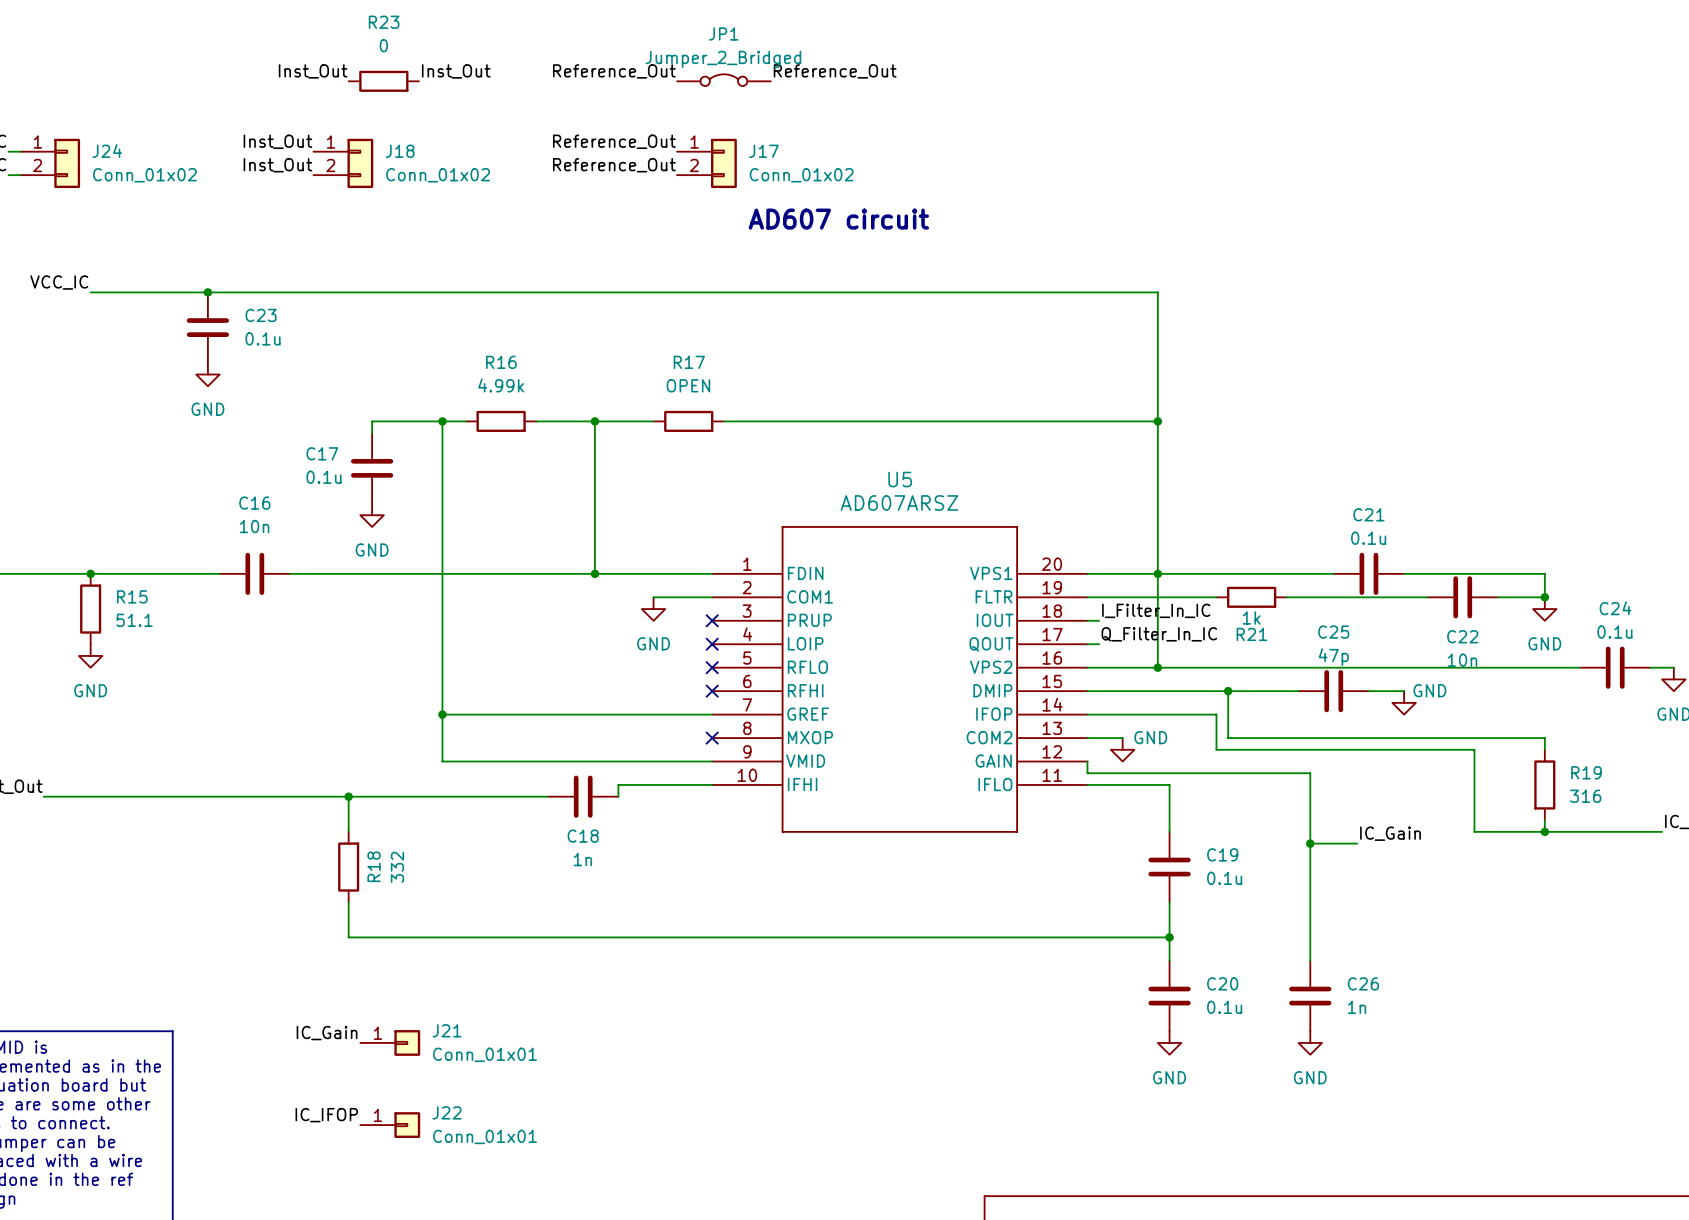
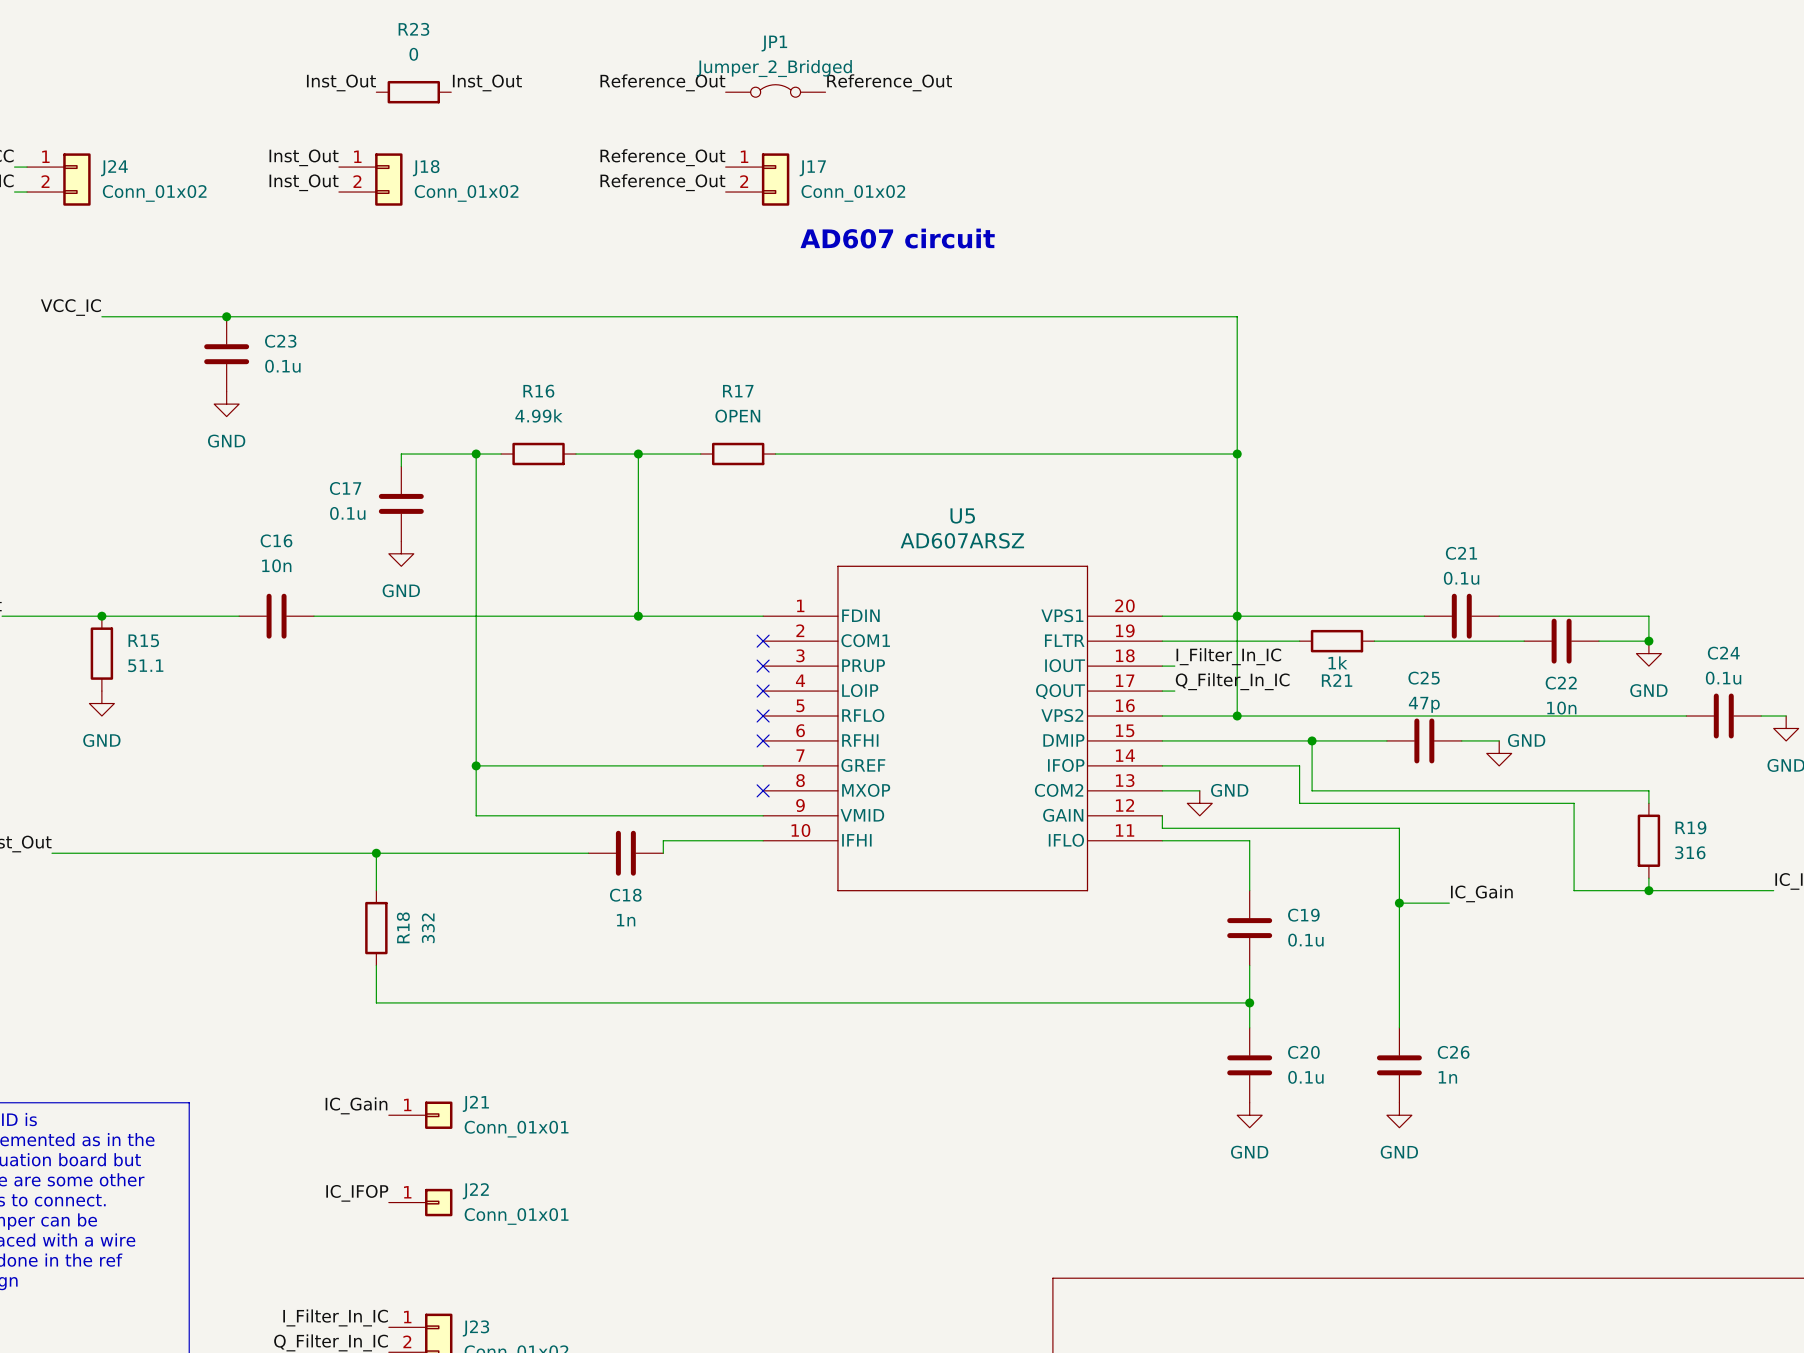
wire: (653, 597) (712, 597) -> none
no-connect mark: none -> (763, 641)
power symbol: GND (653, 609) -> none

